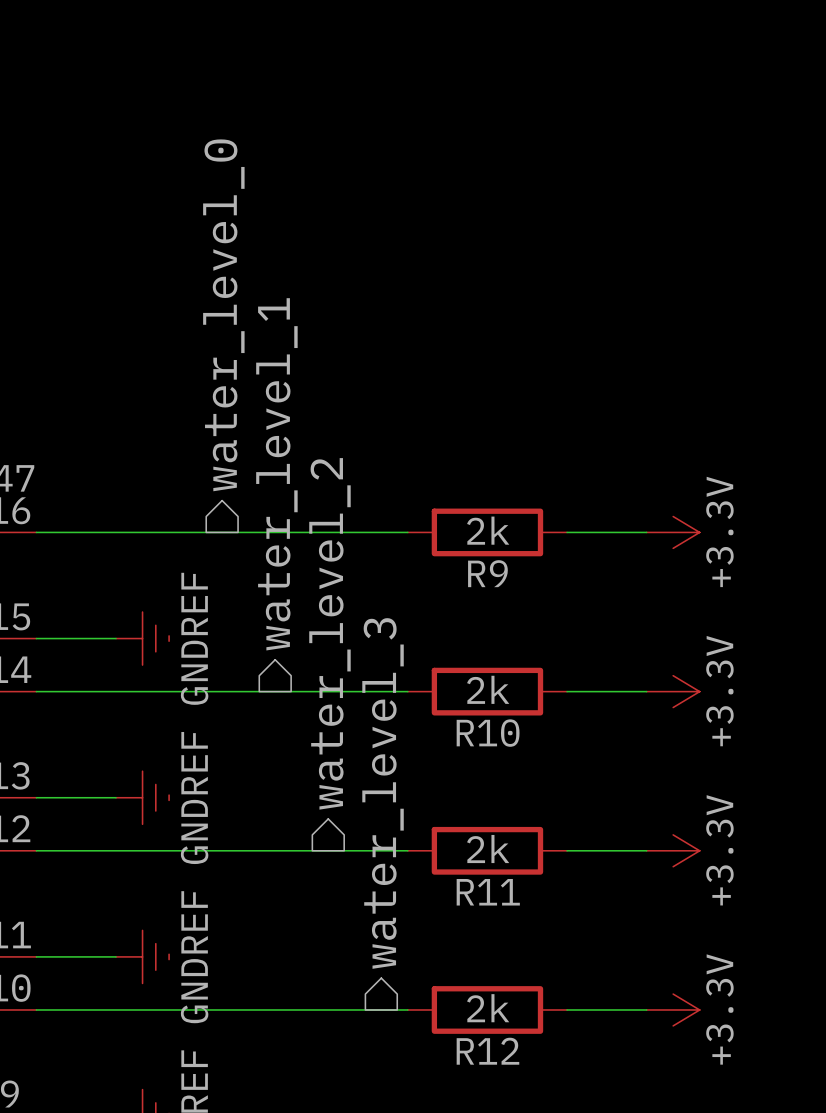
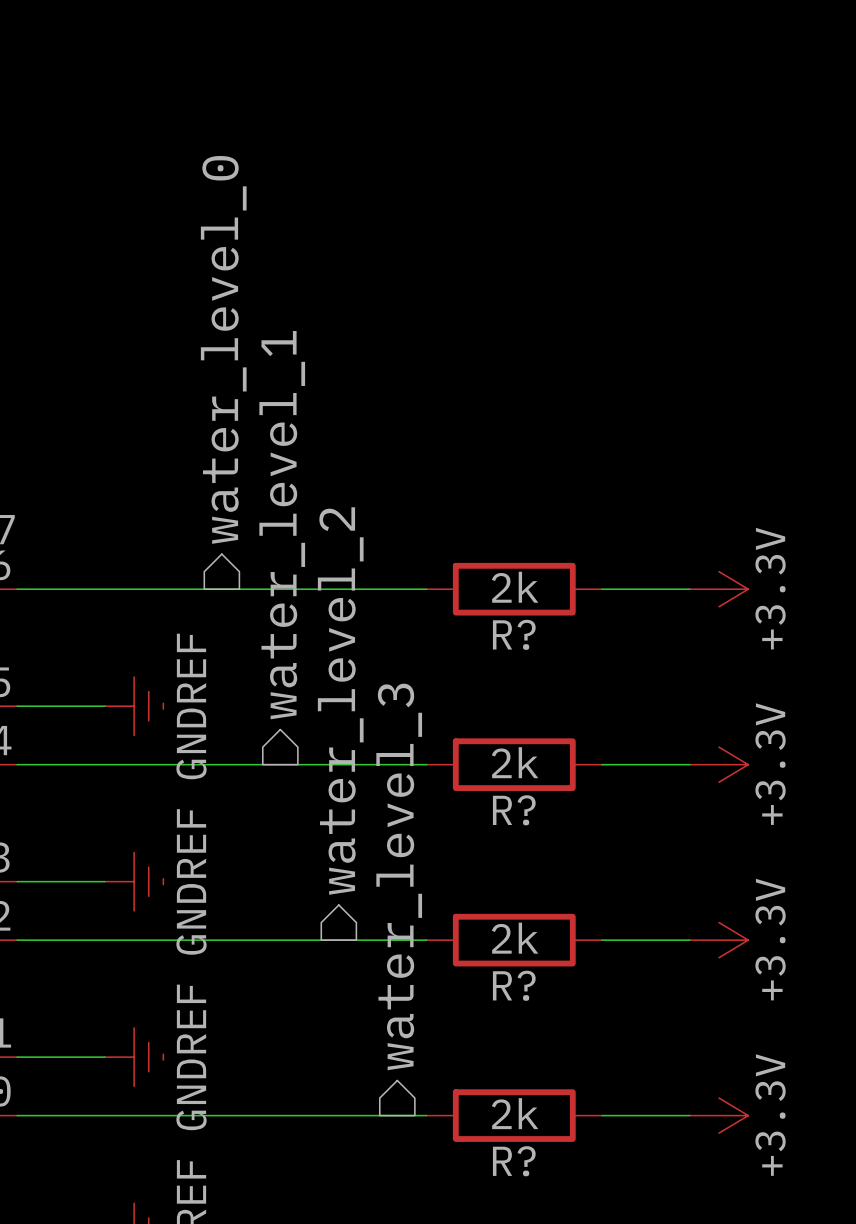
R9 name: R9 (487, 573) -> R? (514, 634)
R10 name: R10 (488, 733) -> R? (514, 810)
R11 name: R11 (488, 892) -> R? (514, 985)
R12 name: R12 (487, 1051) -> R? (514, 1161)

